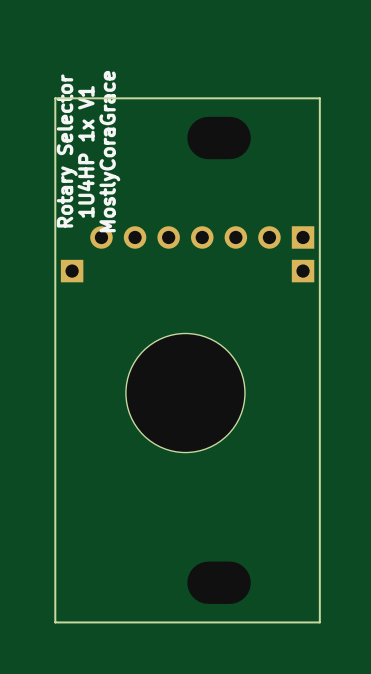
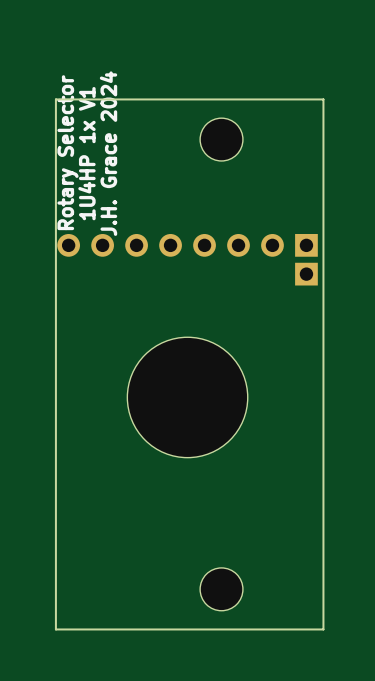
part footprint: [187, 116, 251, 160] -> [200, 118, 243, 161]
text: MostlyCoraGrace (109, 151) -> J.H. Grace 2024 (108, 153)
part: (202, 237) -> none
part: none -> (187, 245)
part: (72, 271) -> none
part footprint: [187, 561, 251, 604] -> [200, 567, 243, 611]

